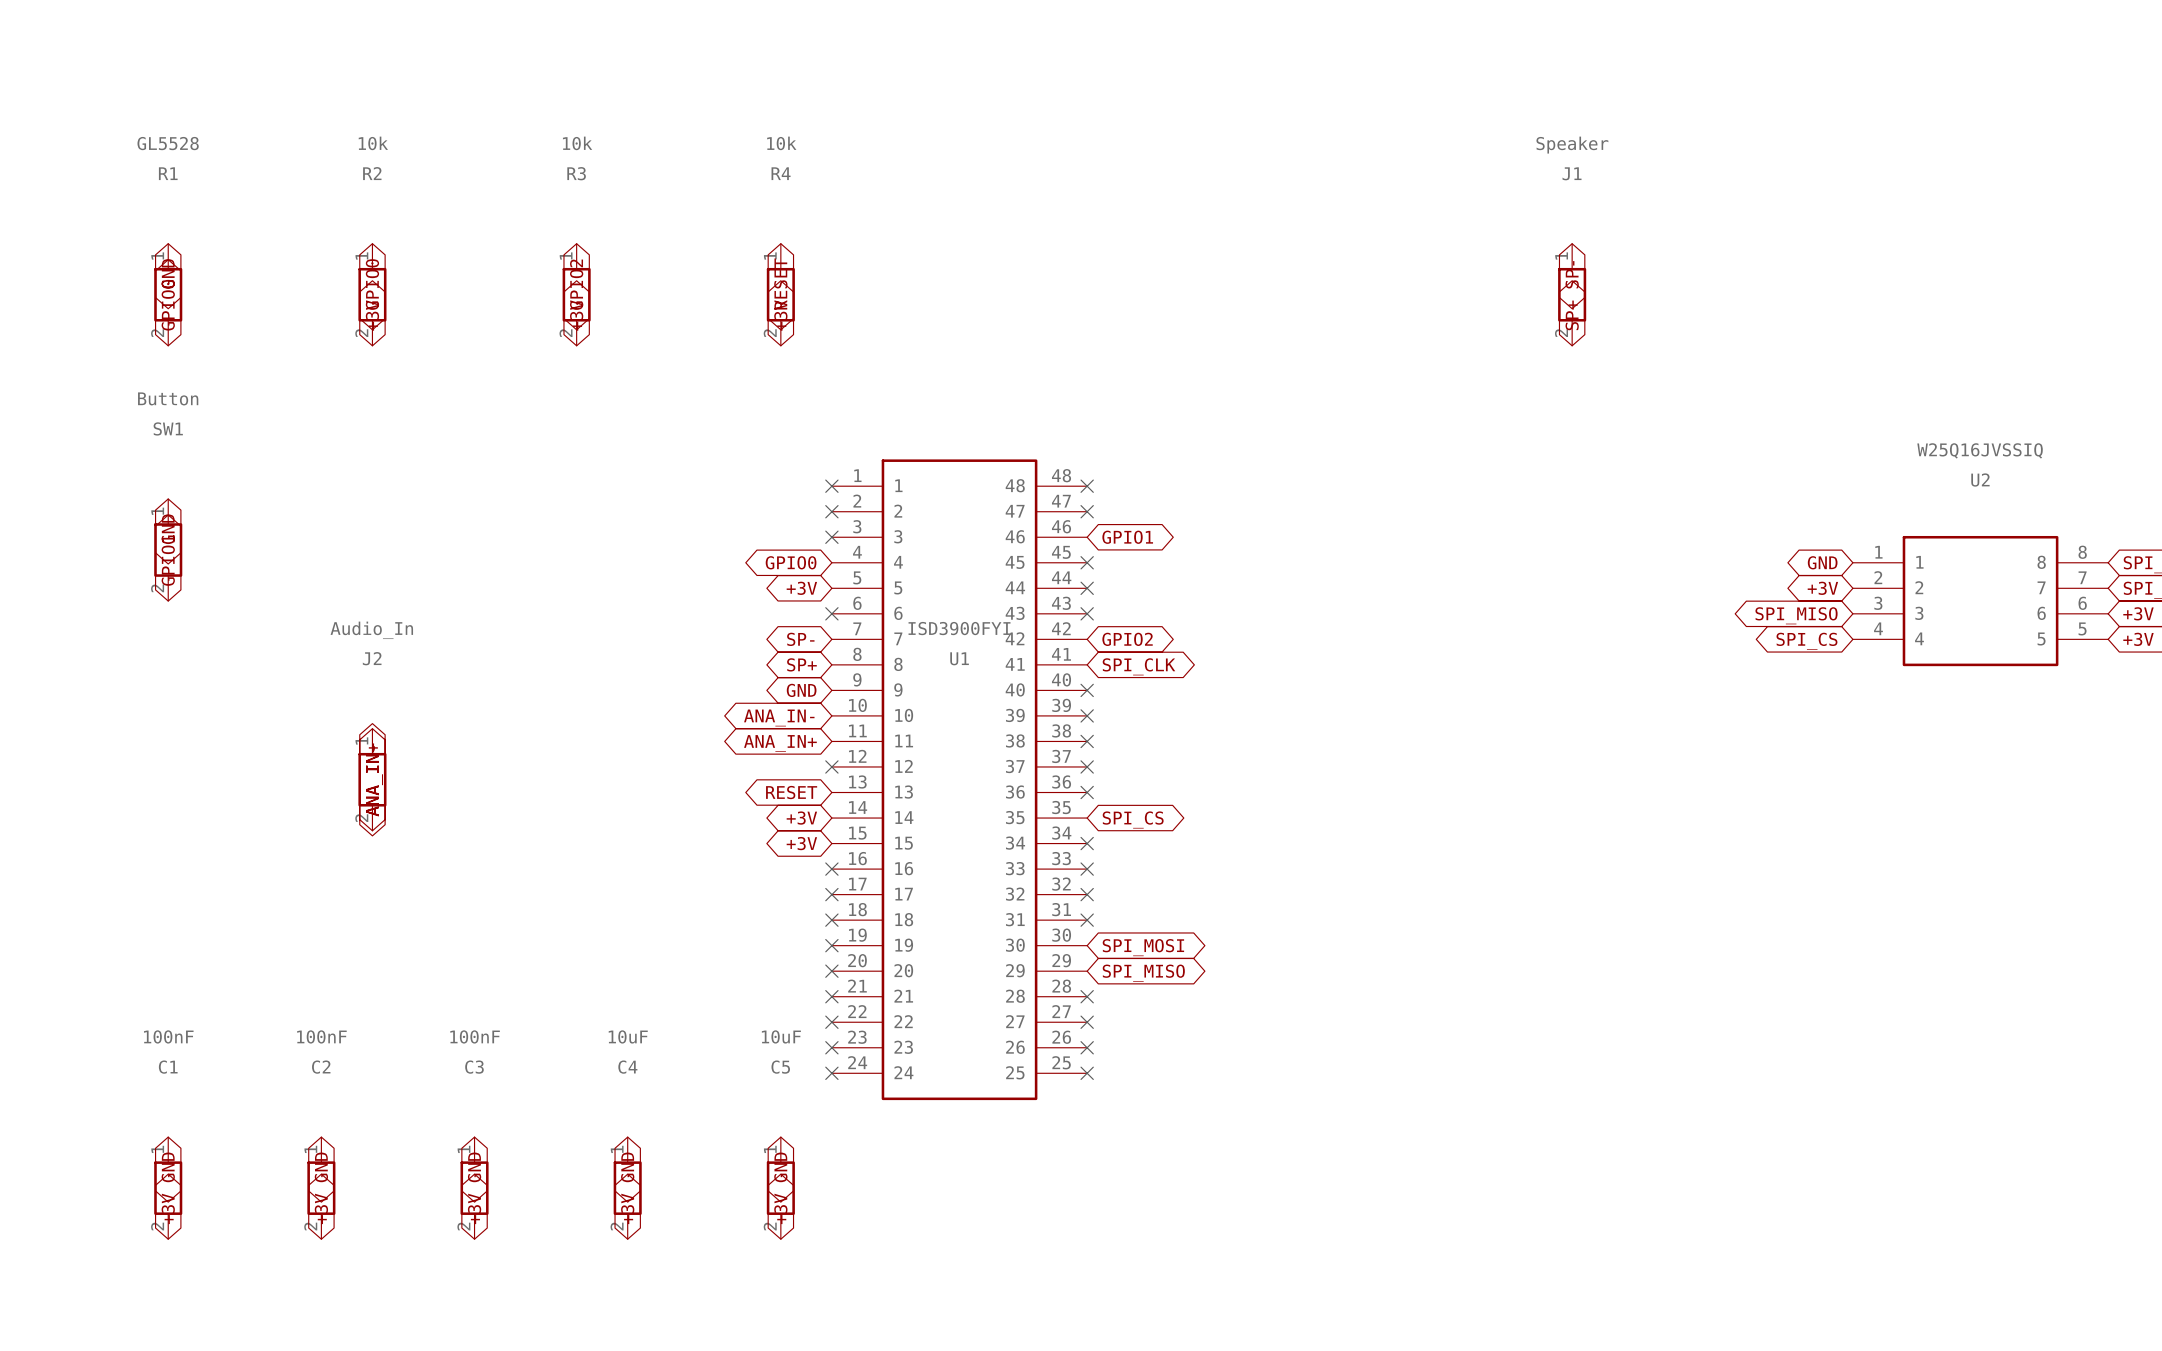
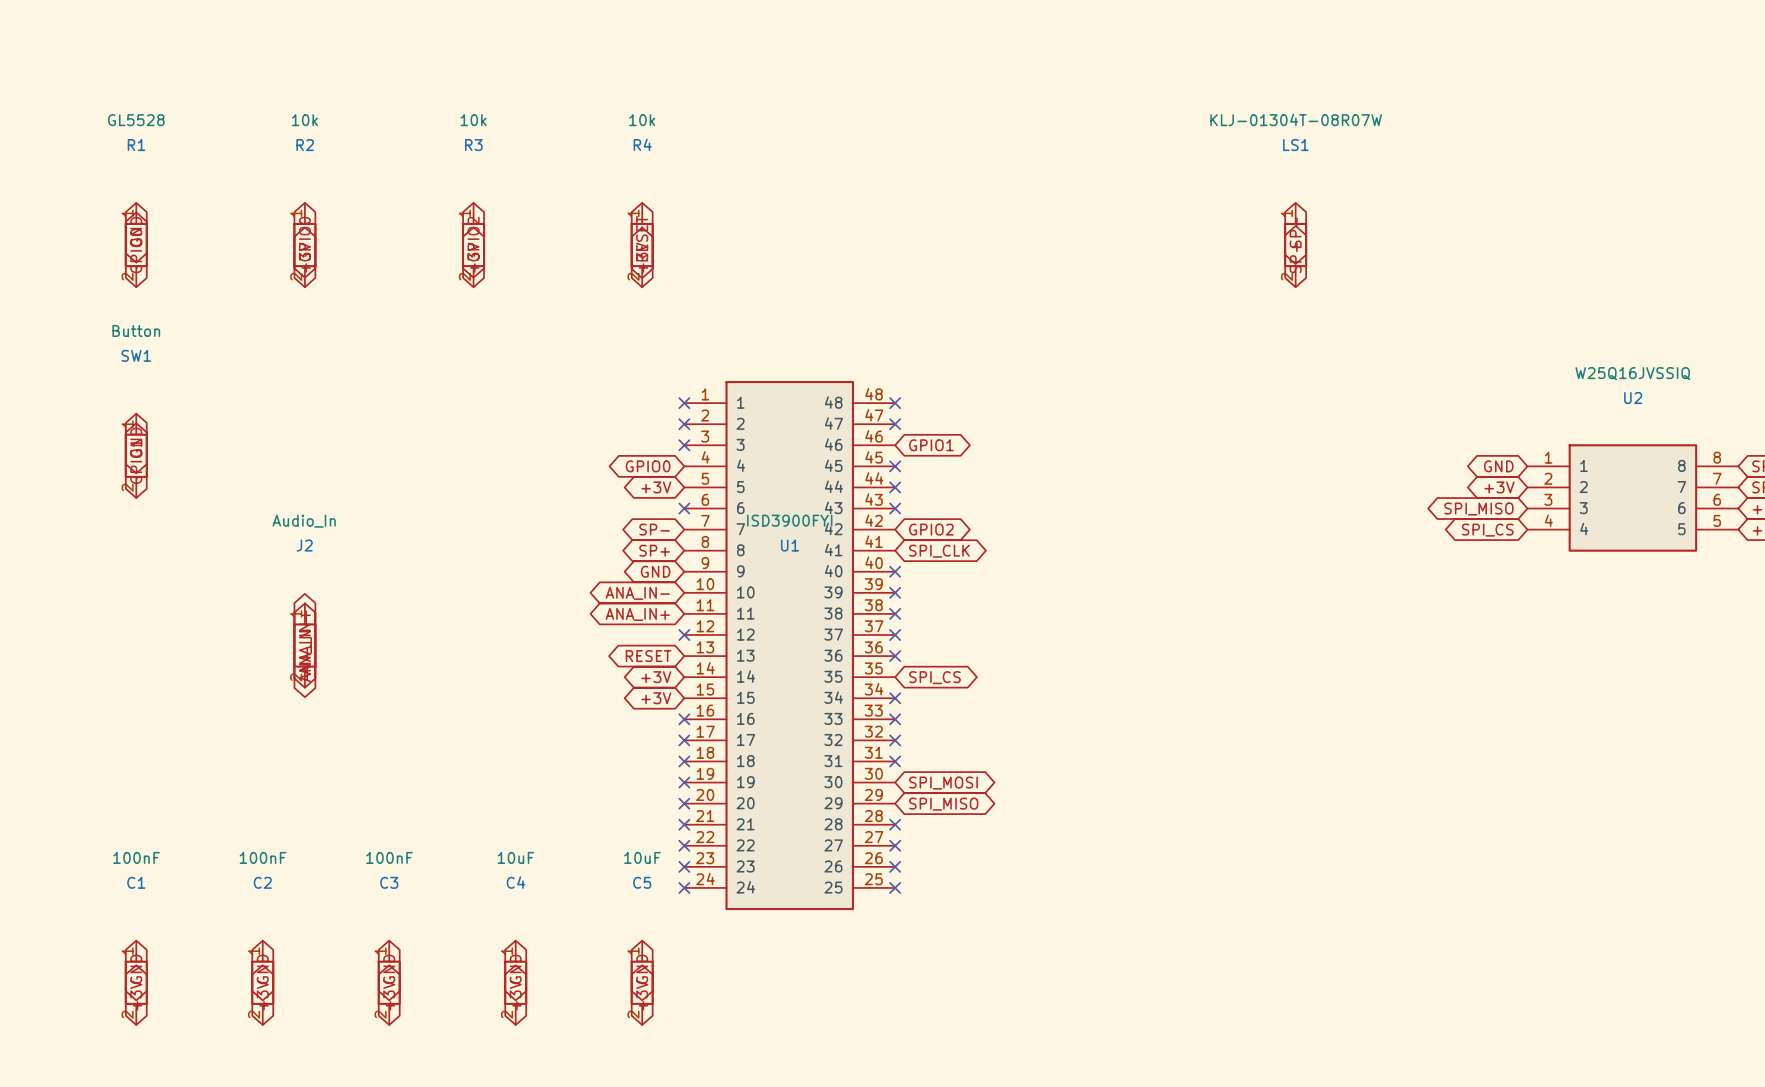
J1 value: Speaker (1572, 145) -> KLJ-01304T-08R07W (1296, 119)
J1 name: J1 (1572, 173) -> LS1 (1295, 145)

